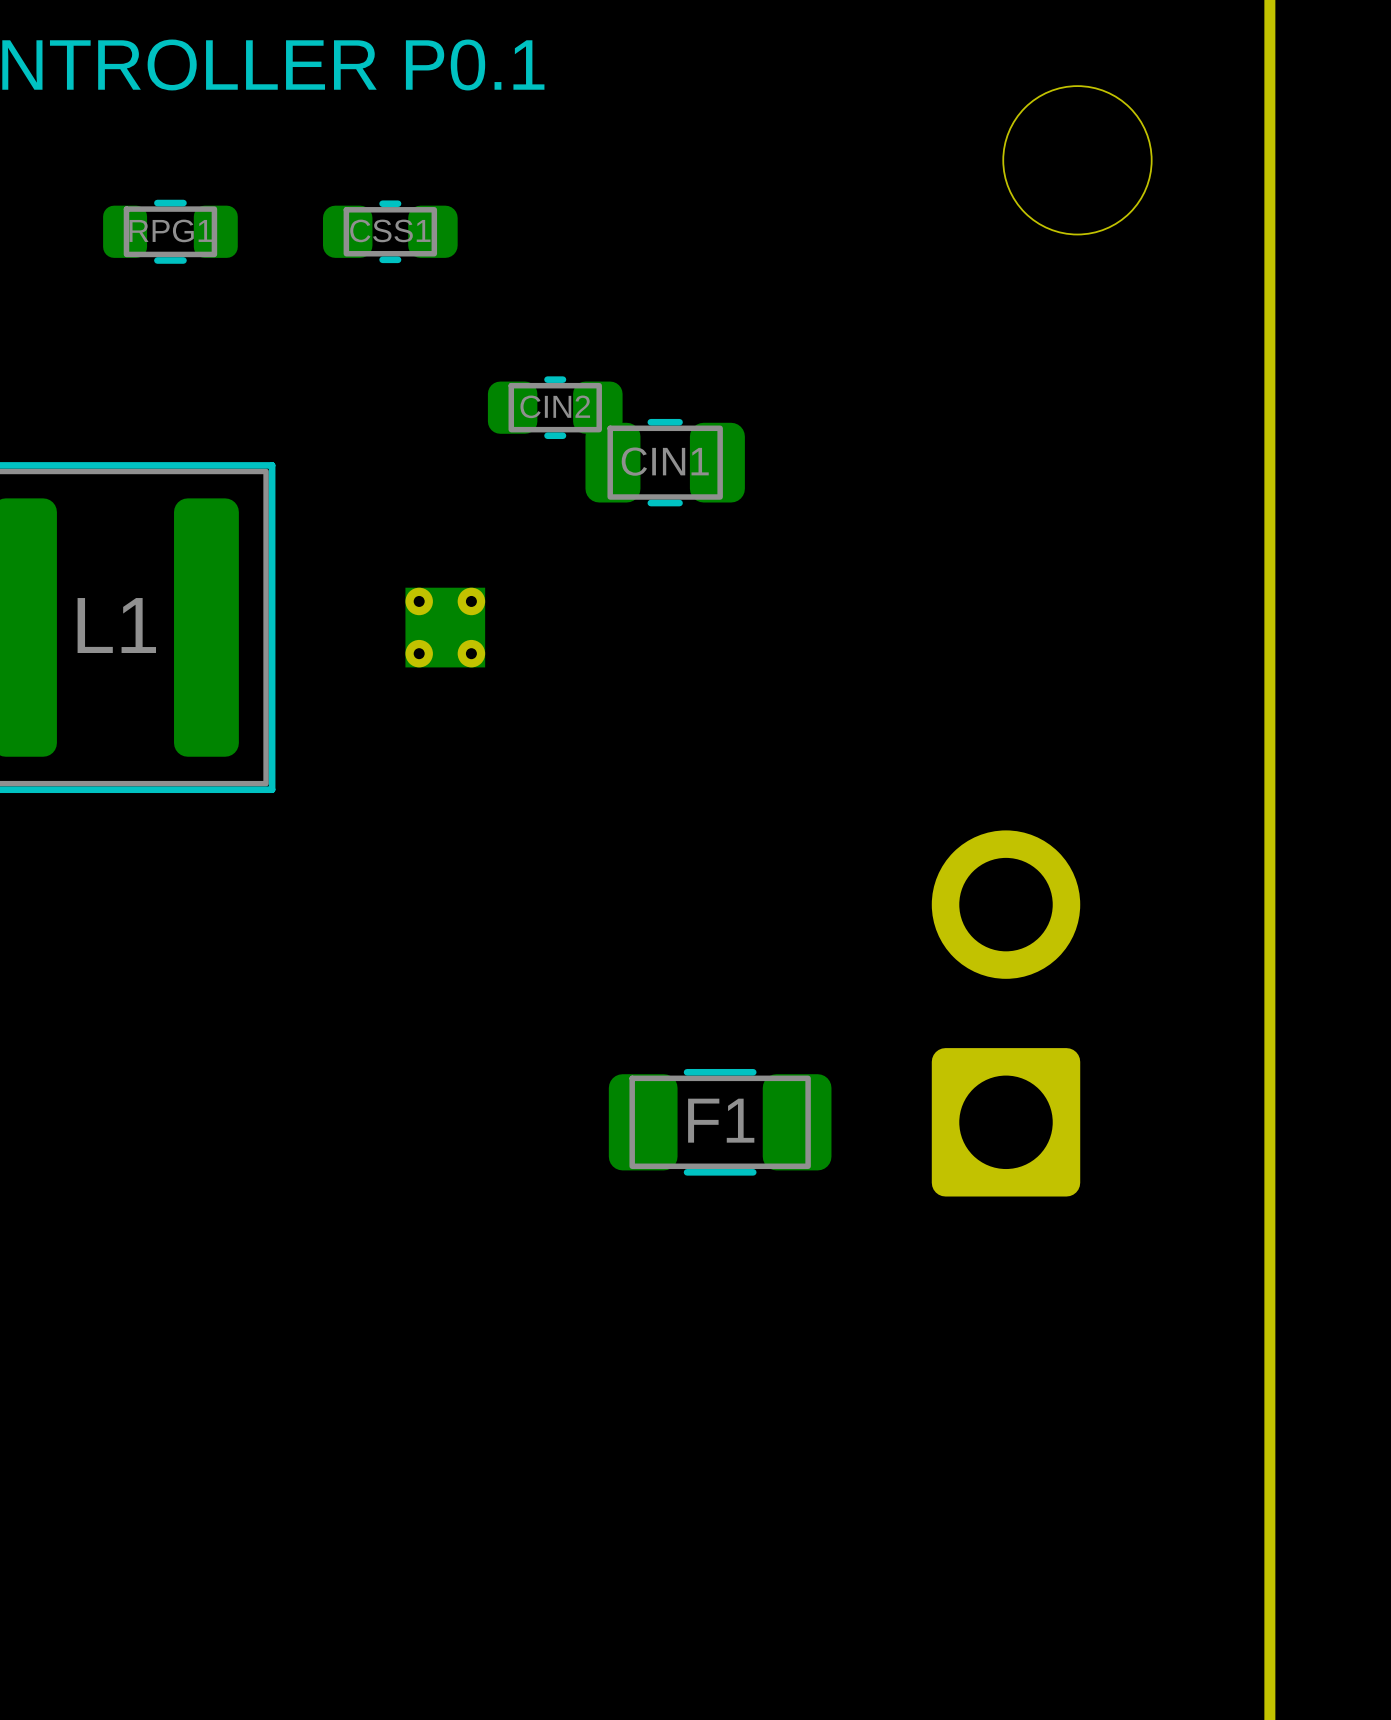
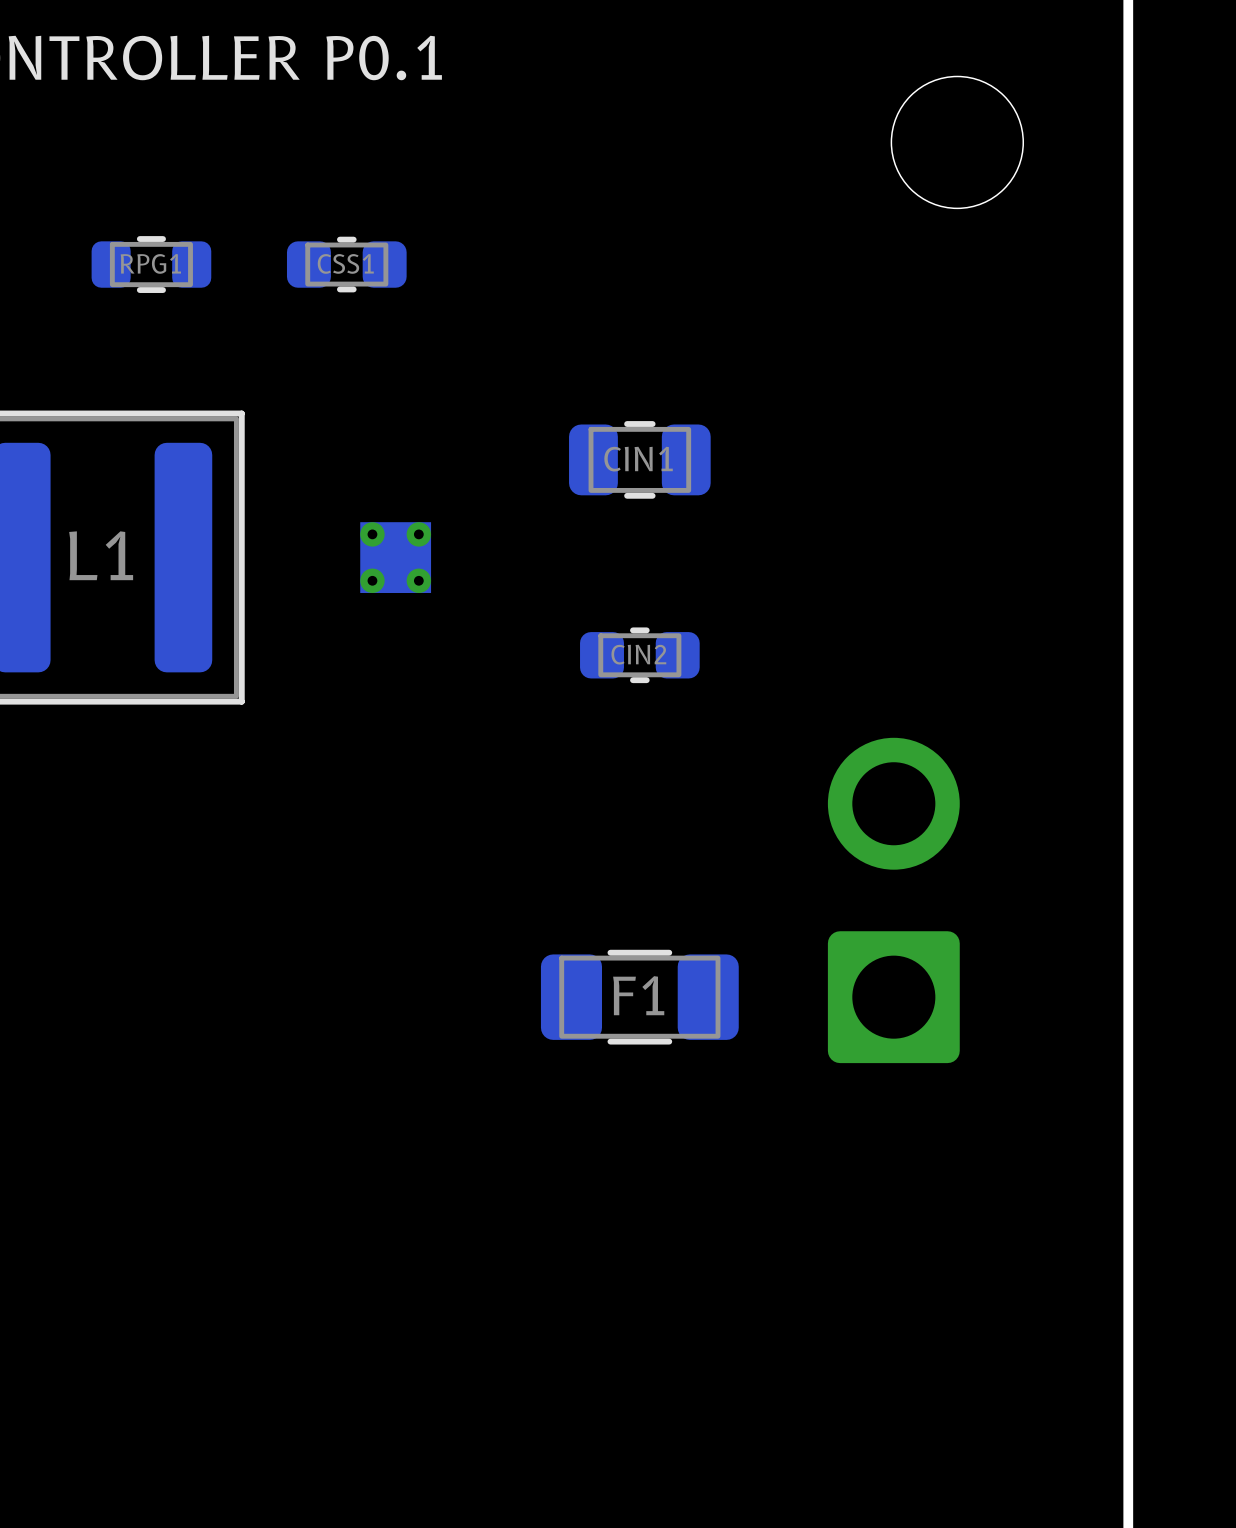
RPG1 position: (170, 231) -> (151, 264)
CSS1 position: (390, 231) -> (346, 264)
CIN2 position: (555, 407) -> (639, 655)
CIN1 position: (665, 462) -> (639, 459)

